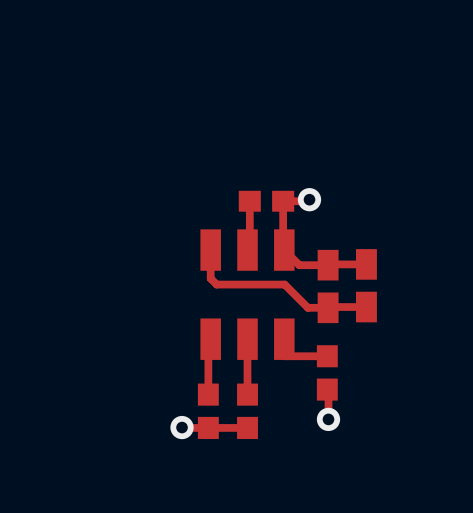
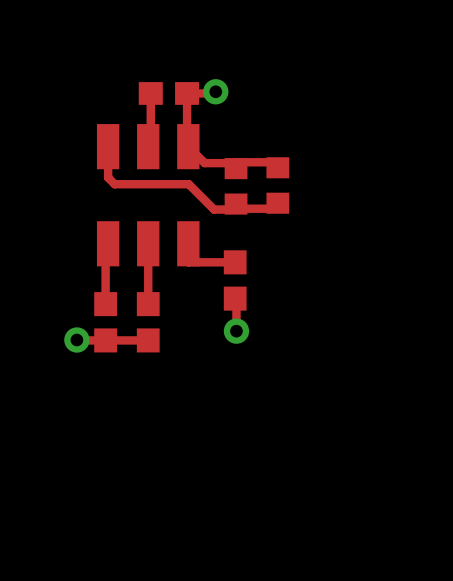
part footprint: [317, 249, 339, 324] -> [224, 158, 248, 215]
part footprint: [356, 249, 377, 323] -> [266, 157, 290, 214]

